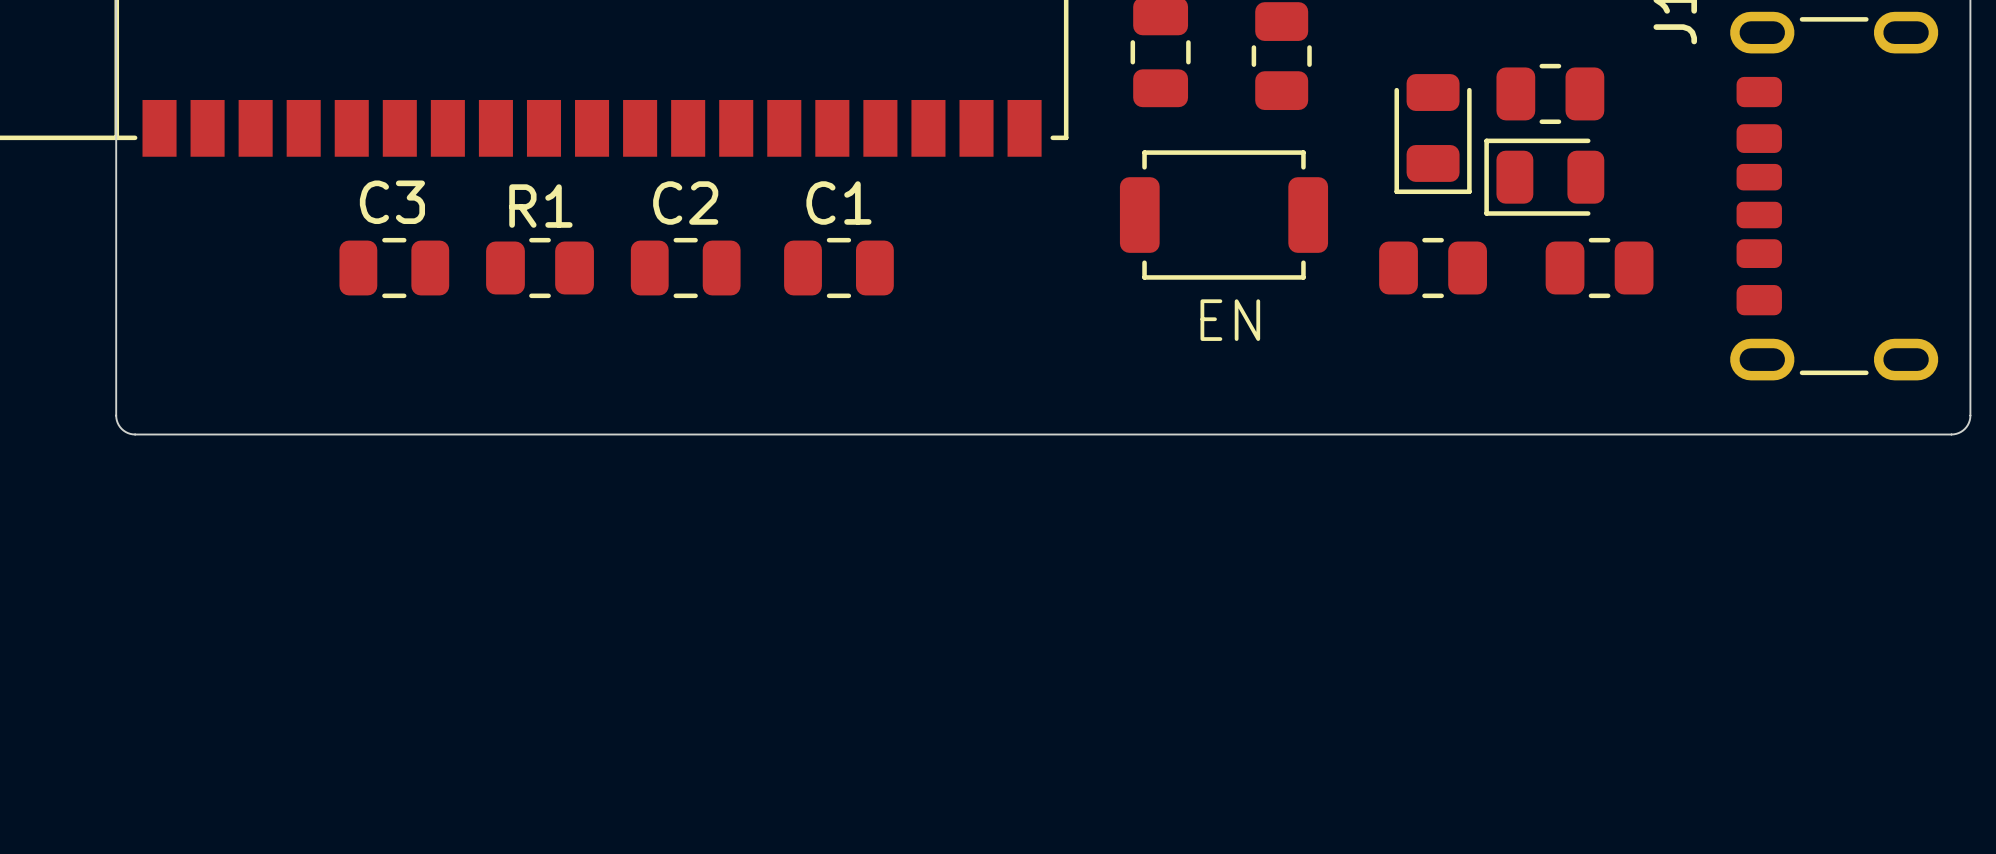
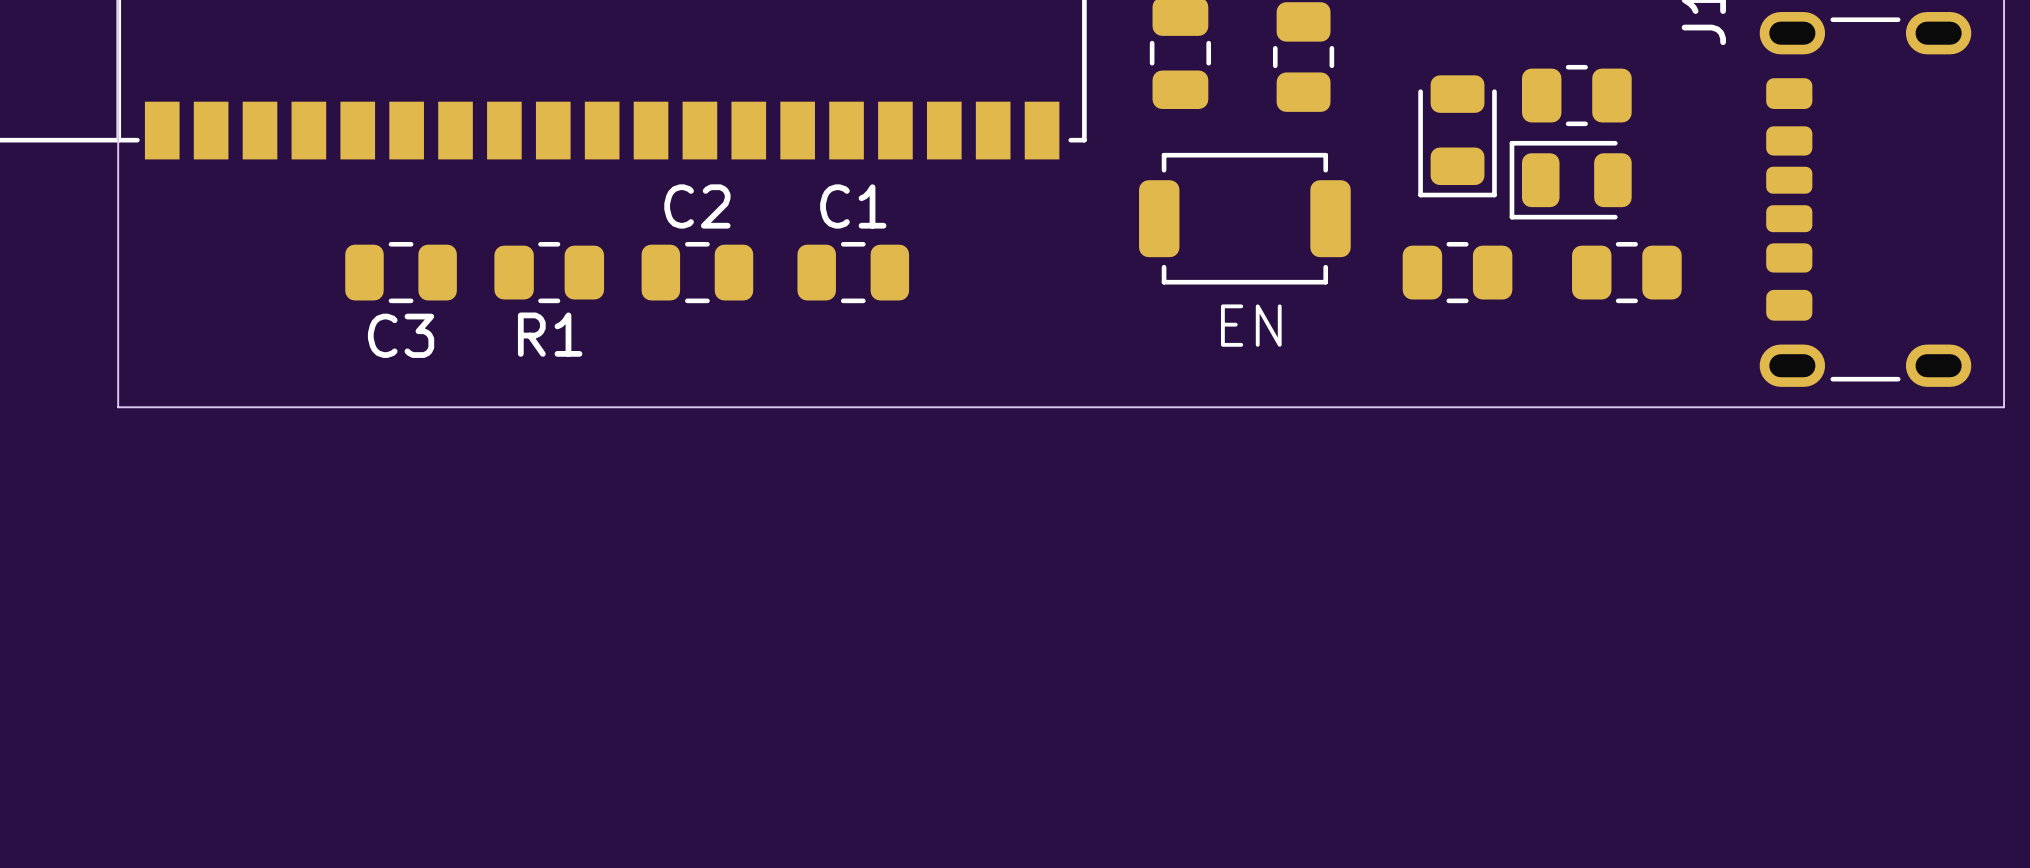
C3 name position: C3 (392, 202) -> C3 (401, 335)
R1 name position: R1 (540, 206) -> R1 (550, 334)
board edge: (116, 400) (116, 418) (118, 425) (125, 431) (135, 434) (1951, 434) (1960, 431) (1967, 425) (1970, 418) (1970, 400) -> (118, 407) (2004, 407)

